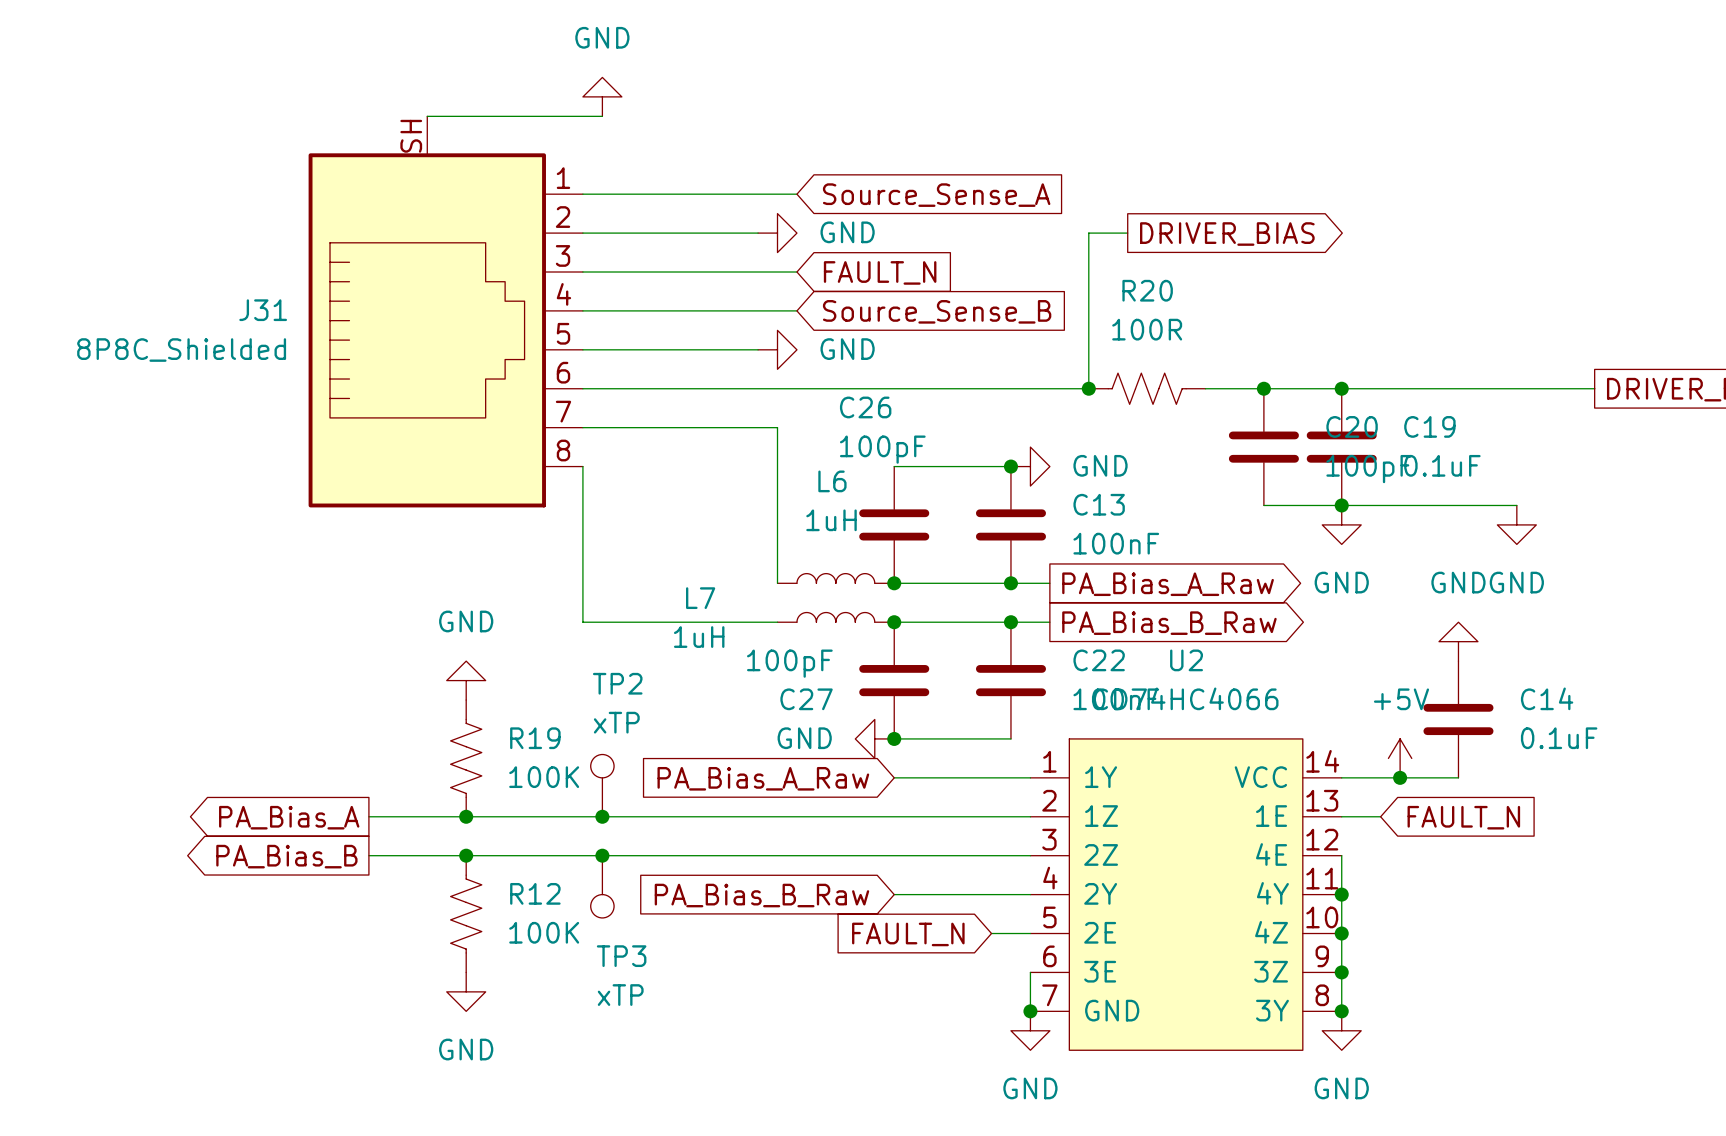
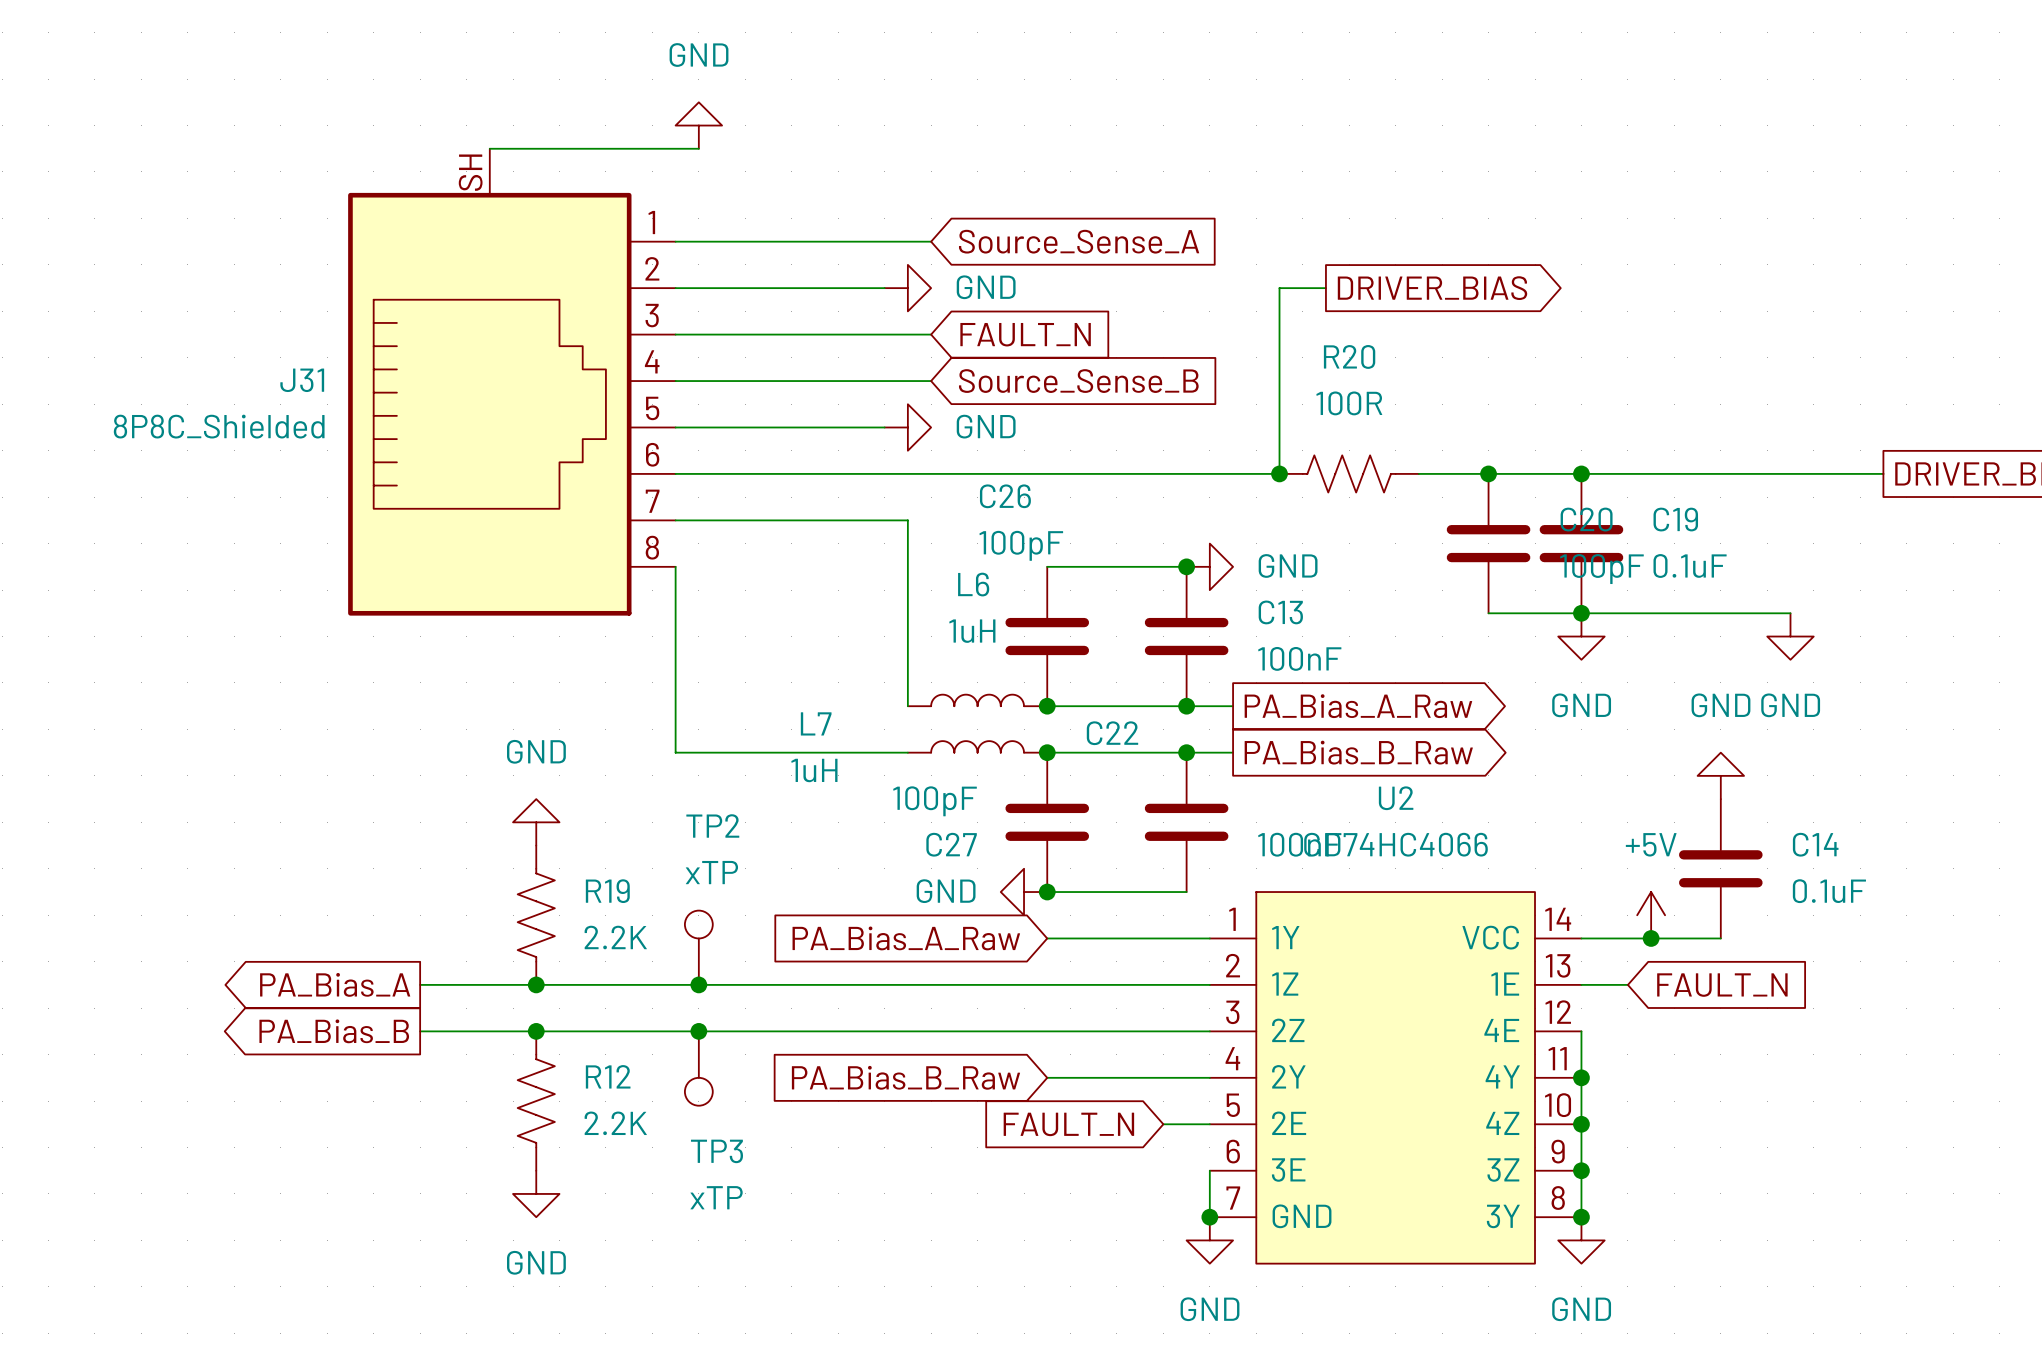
C22 name position: C22 (1099, 660) -> C22 (1112, 733)
R19 value: 100K (544, 777) -> 2.2K (615, 937)
R12 value: 100K (544, 932) -> 2.2K (615, 1123)

